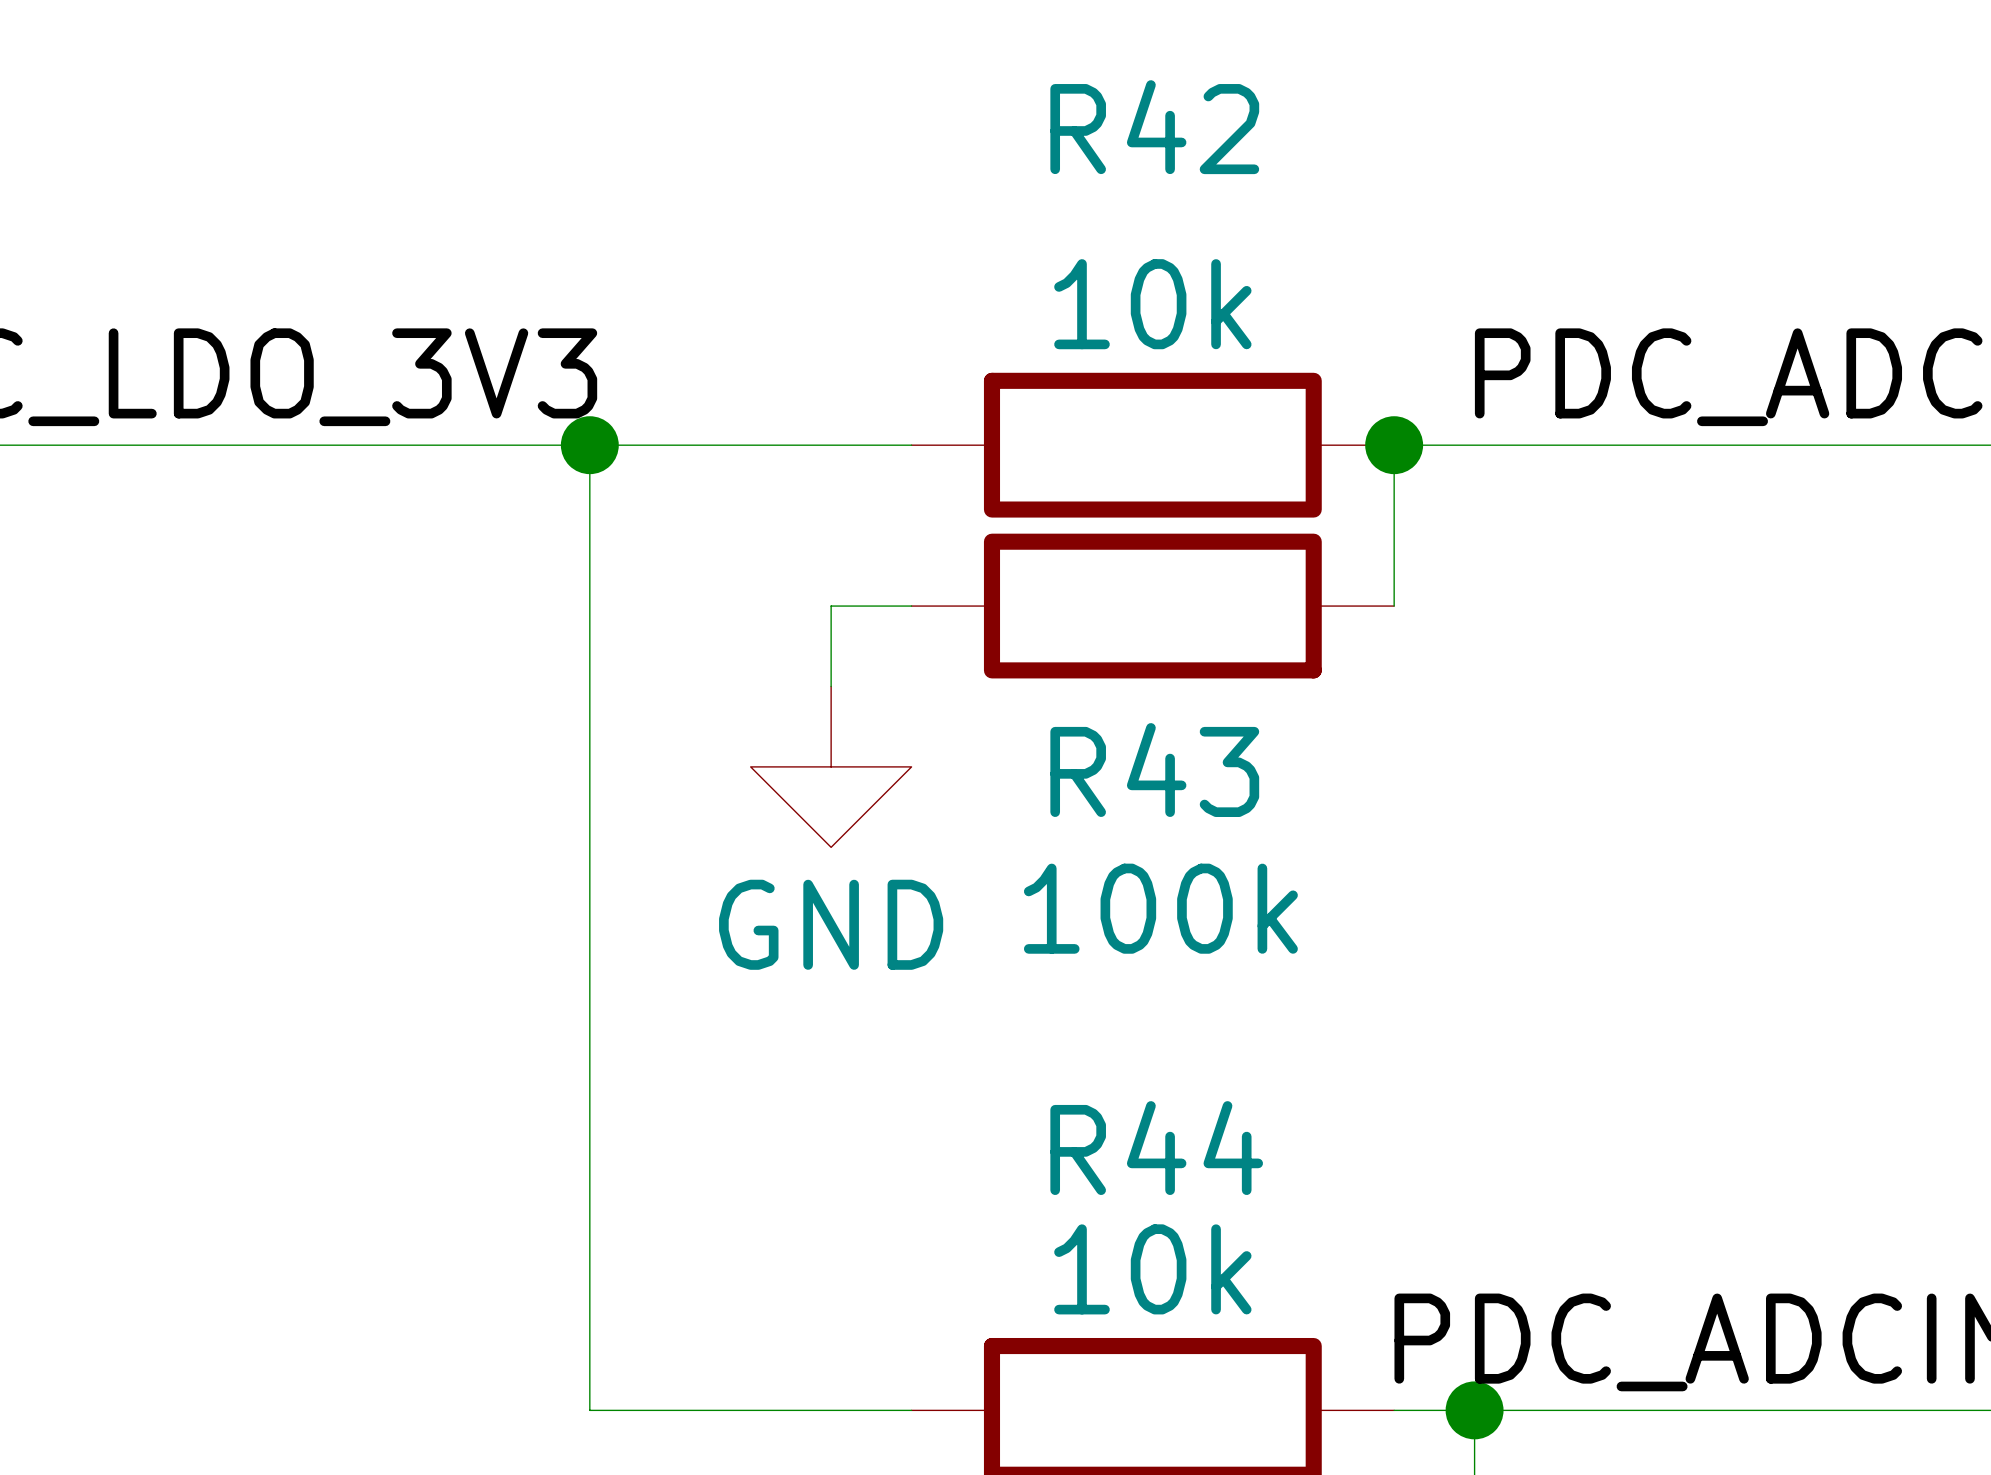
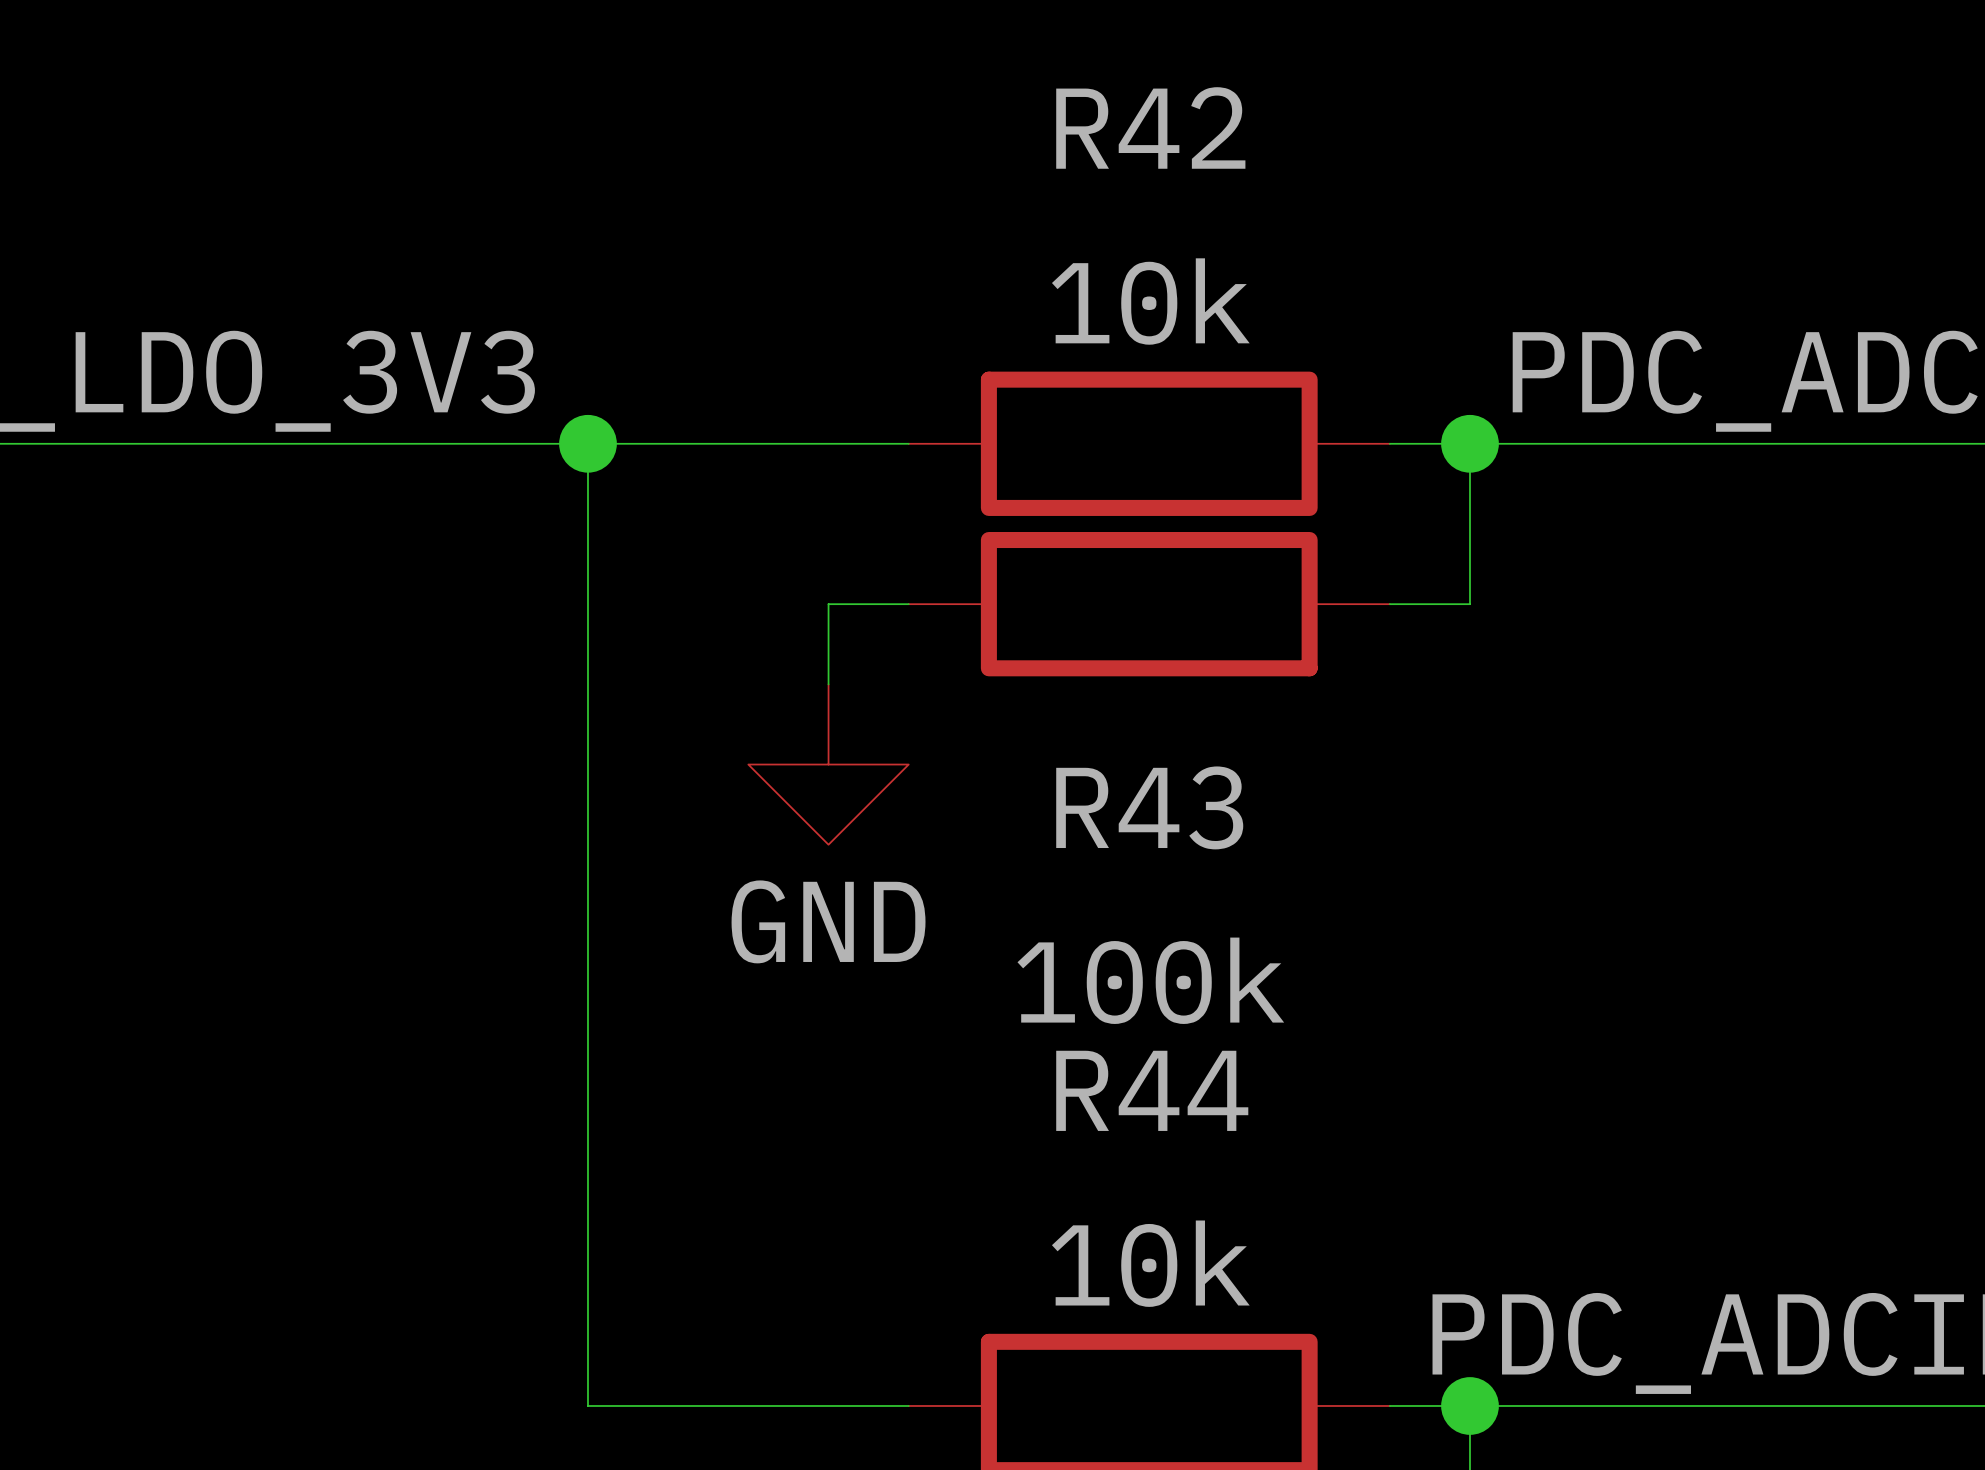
wire: (1394, 445) (1394, 606) -> (1469, 443) (1469, 604) (1389, 604)
junction position: (1394, 445) -> (1469, 443)
R43 name position: R43 (1154, 770) -> R43 (1149, 807)
R43 text position: 100k (1160, 908) -> 100k (1150, 980)
R44 name position: R44 (1156, 1148) -> R44 (1152, 1090)

